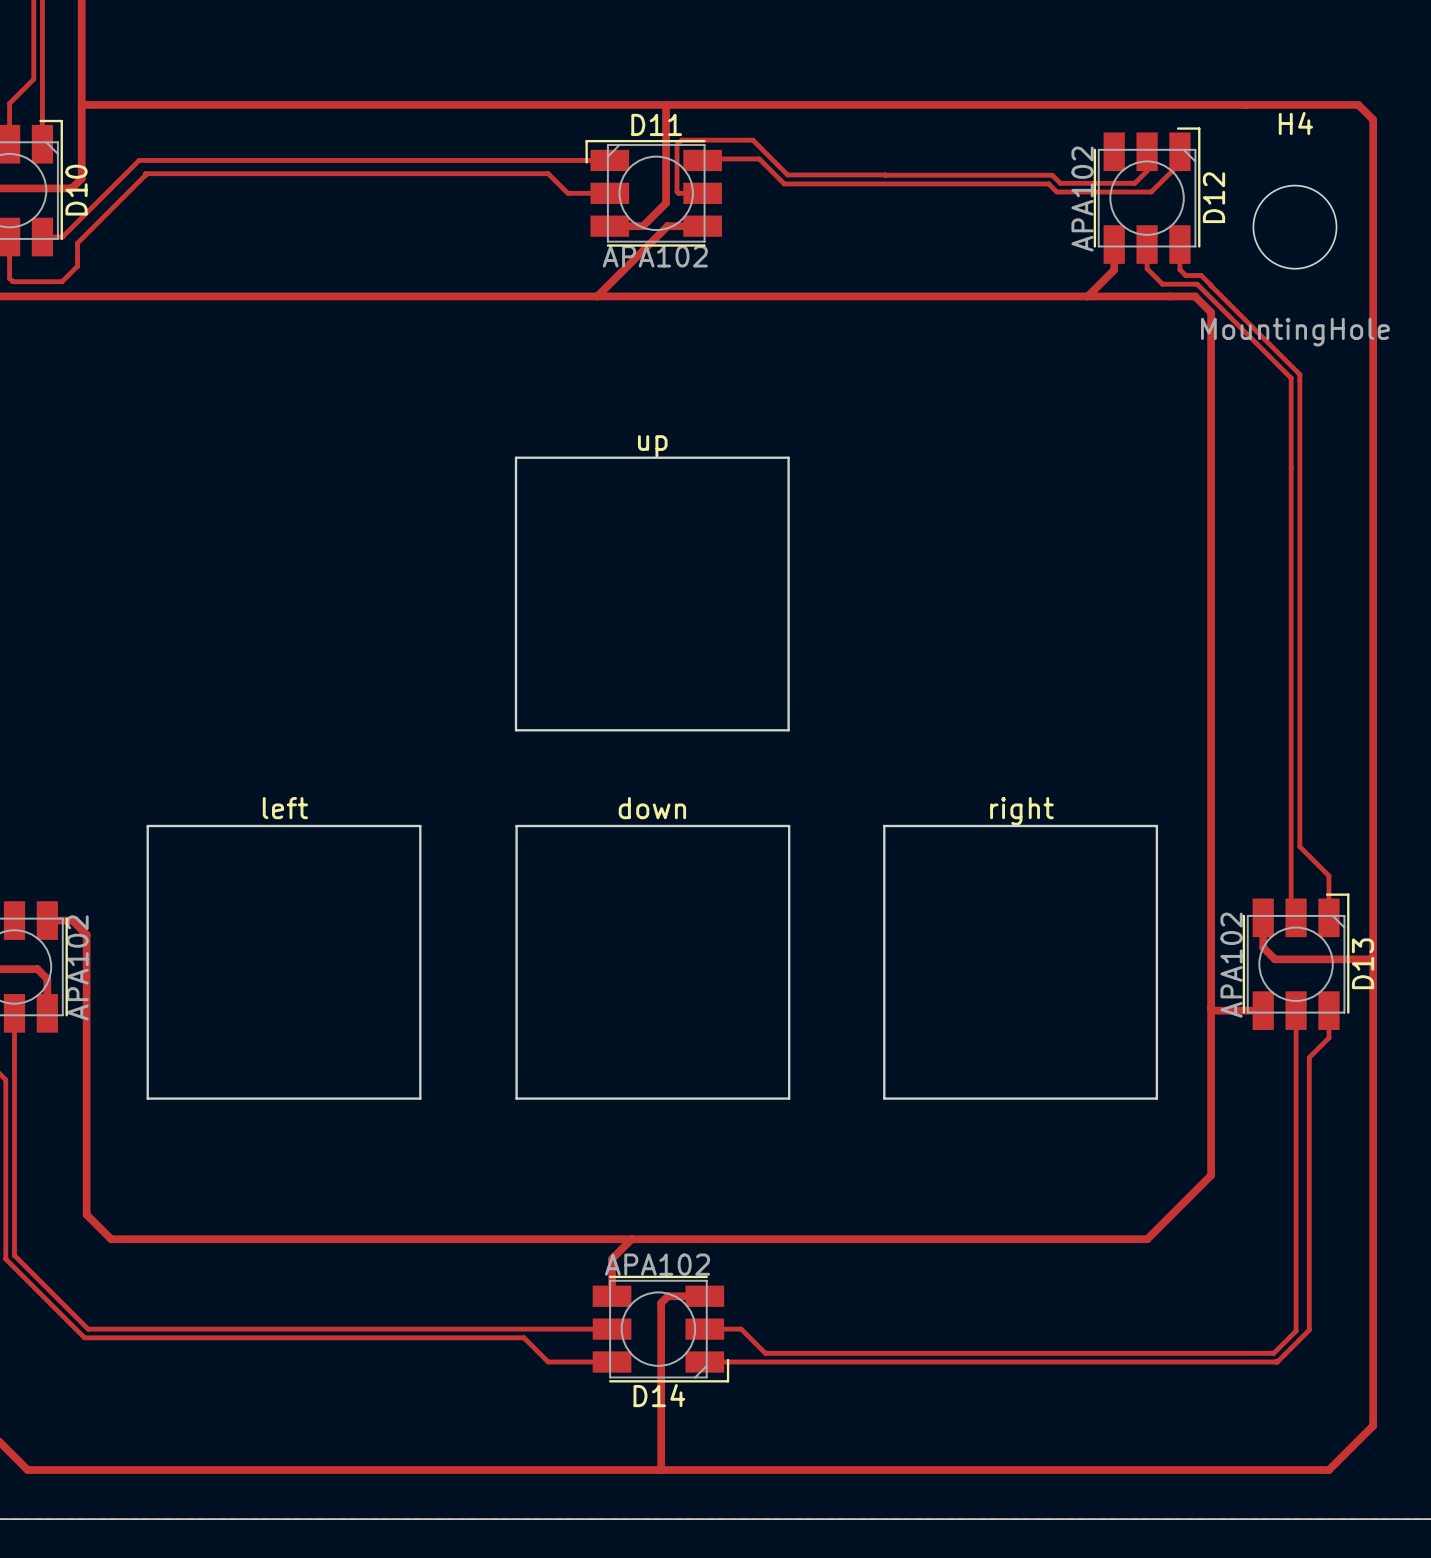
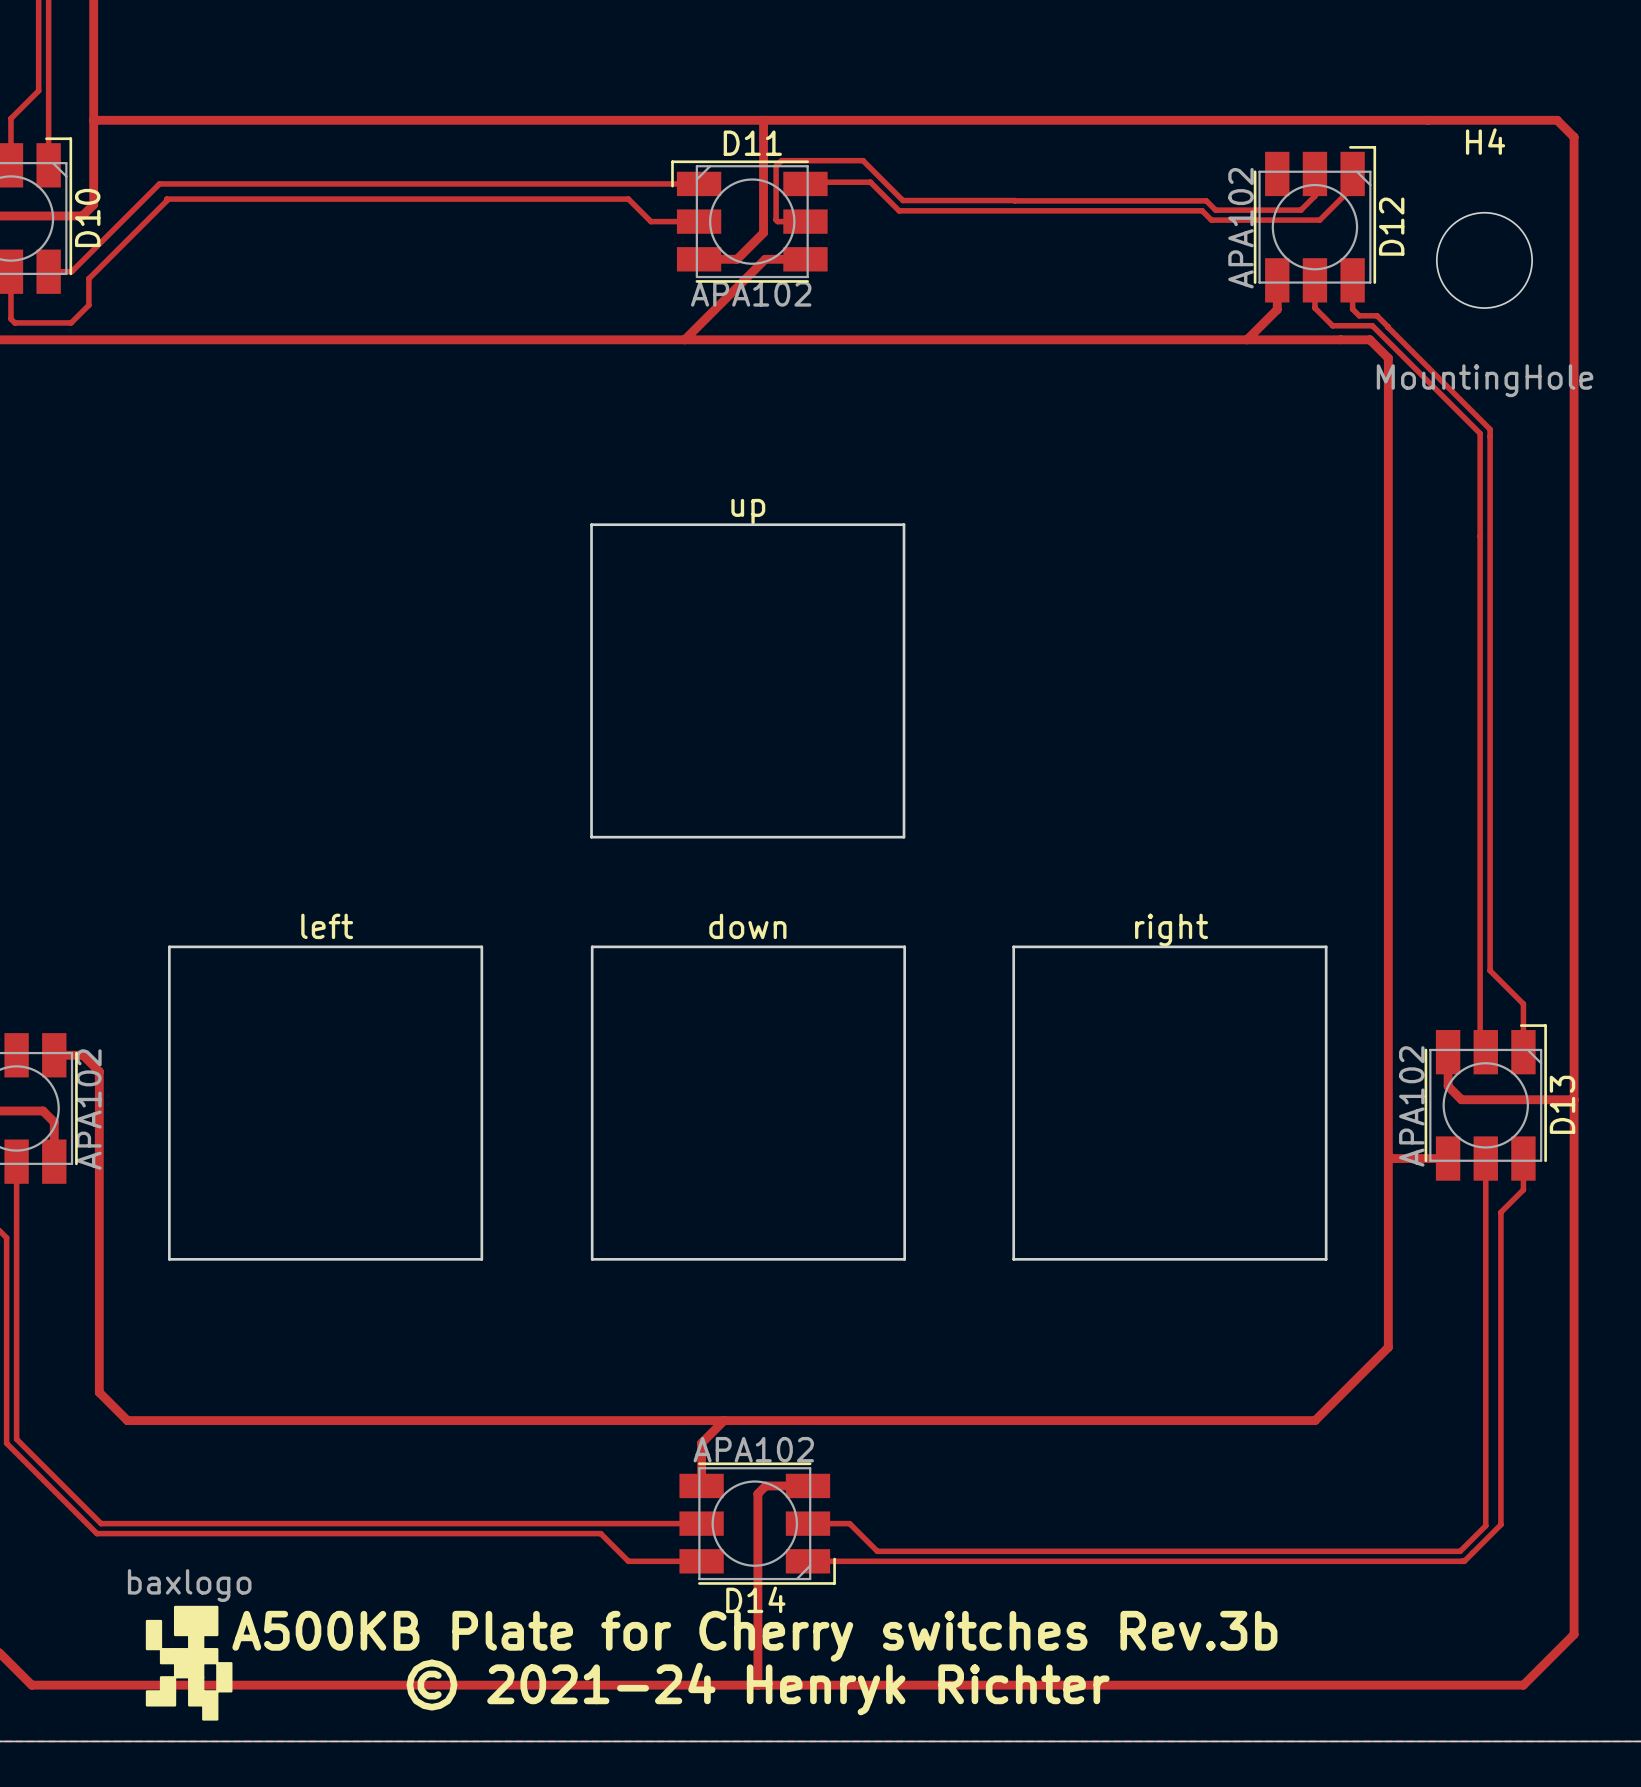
drawing: none -> [145, 1605, 233, 1721]
text: none -> A500KB Plate for Cherry switches Rev.3b (754, 1636)
text: none -> © 2021-24 Henryk Richter (758, 1687)

